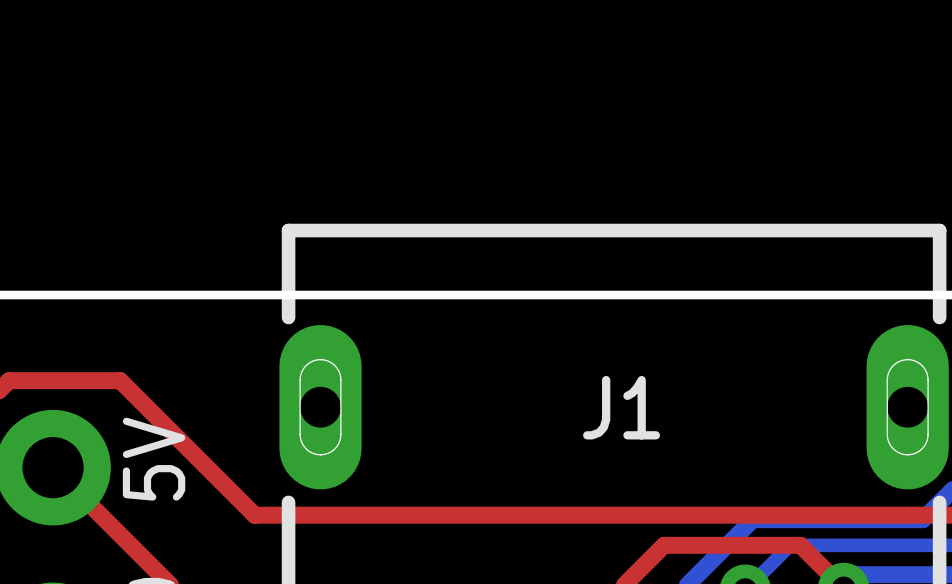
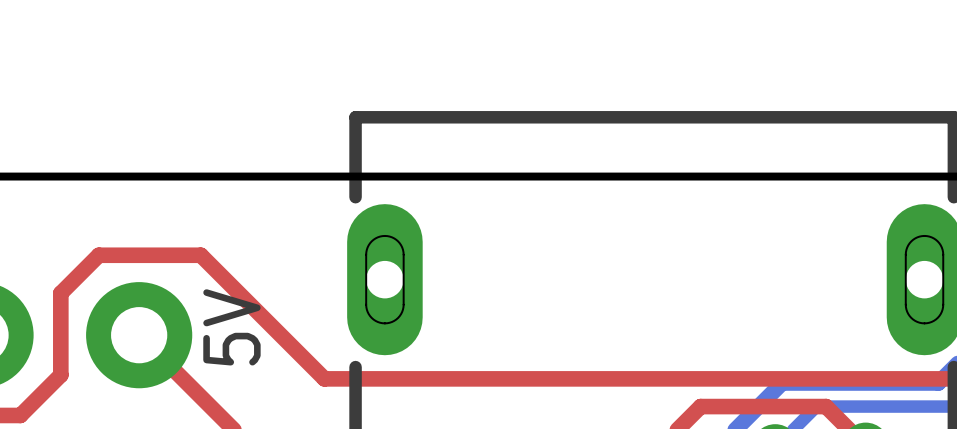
J1 name: J1 (621, 407) -> none

